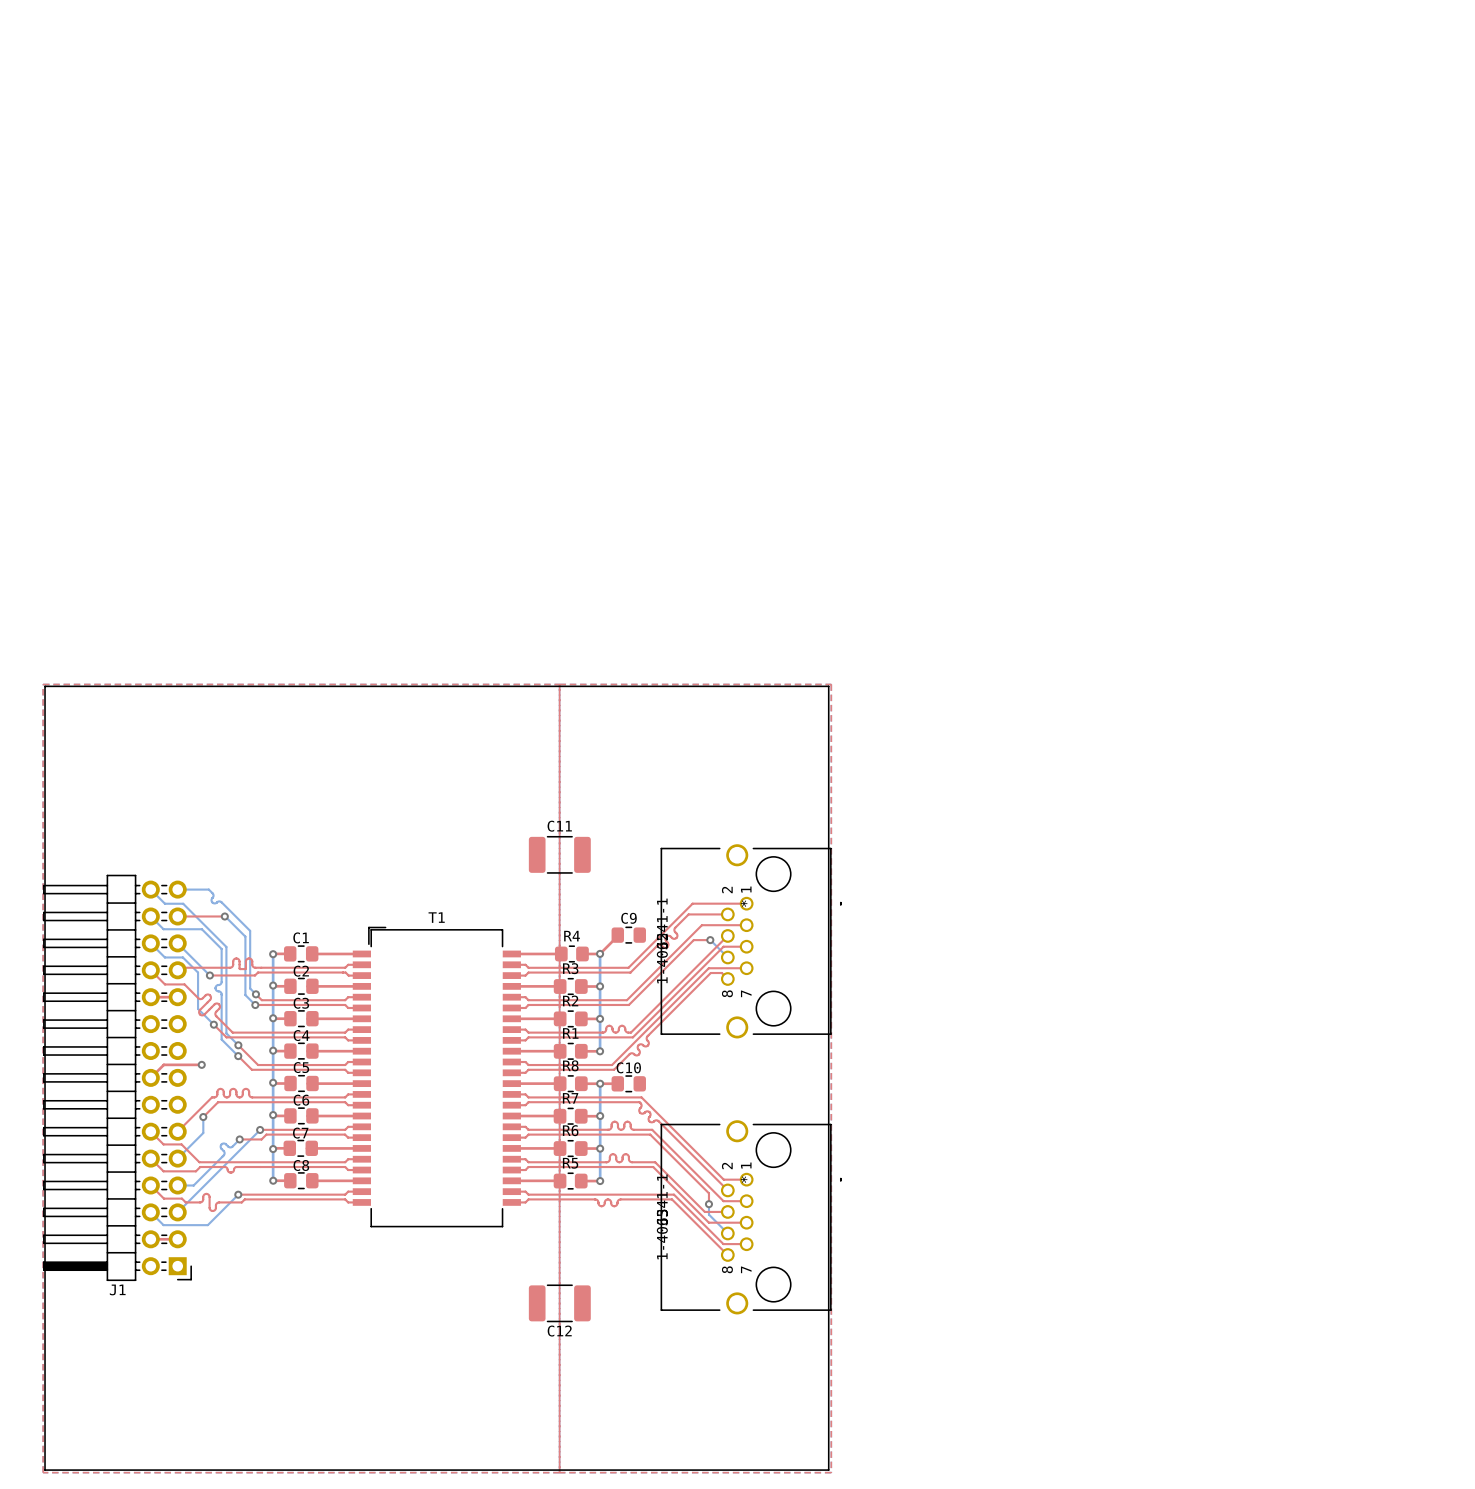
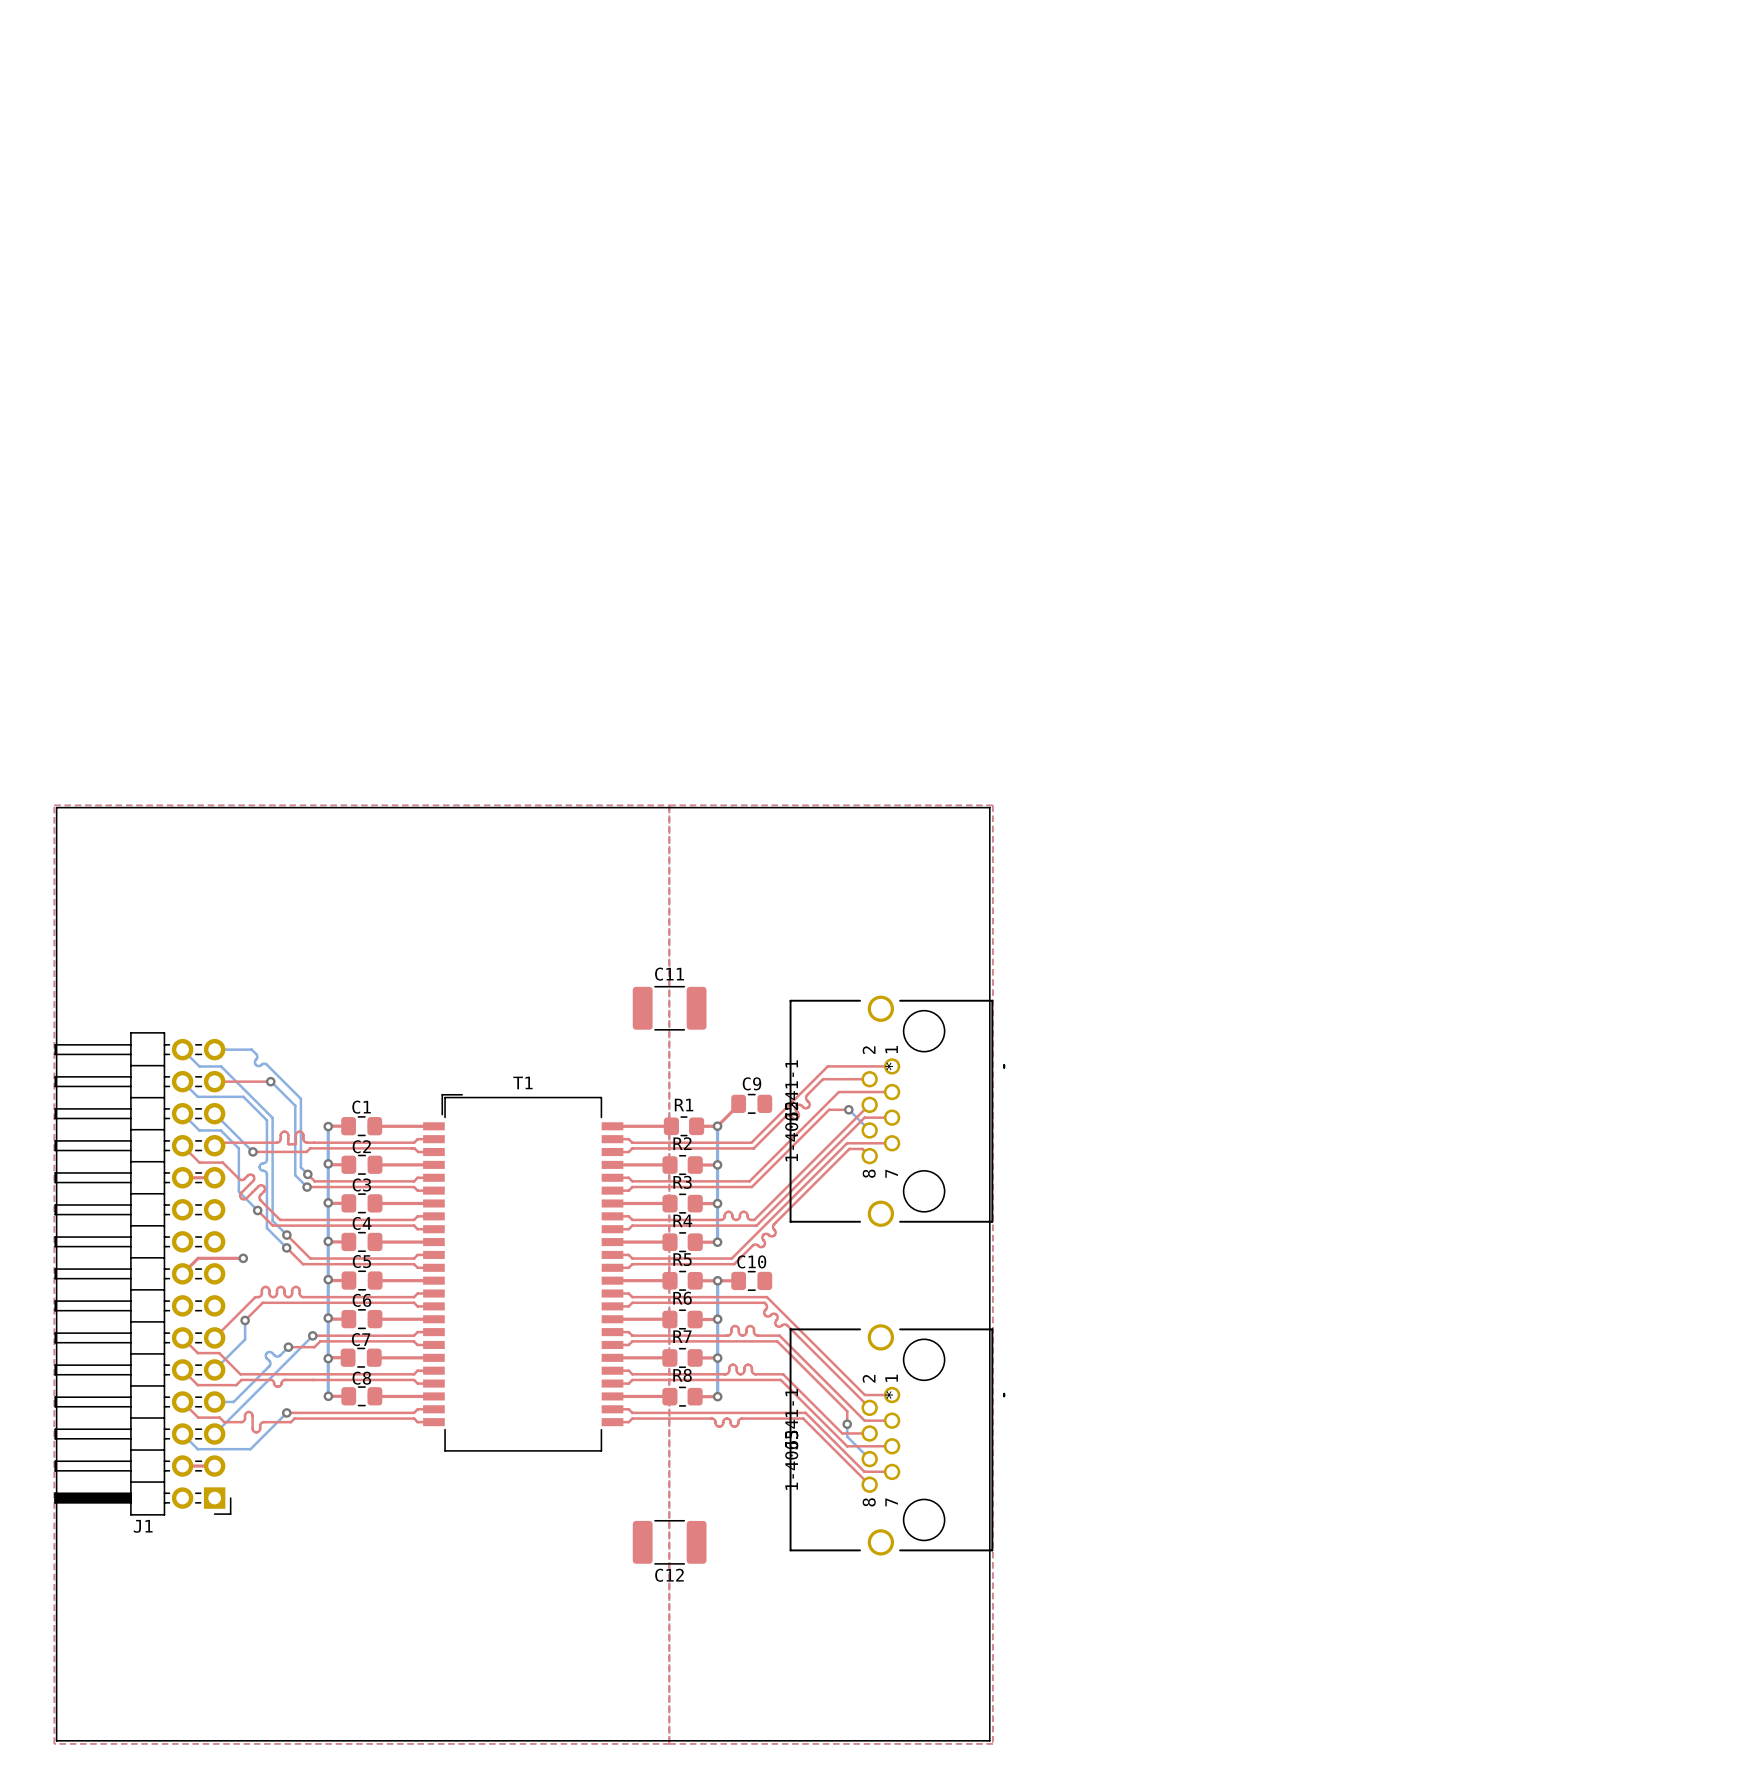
R4 name: R4 (572, 936) -> R1 (684, 1105)
R3 name: R3 (570, 968) -> R2 (682, 1143)
R2 name: R2 (570, 1000) -> R3 (682, 1182)
R1 name: R1 (570, 1033) -> R4 (682, 1220)
R8 name: R8 (570, 1065) -> R5 (682, 1259)
R7 name: R7 (570, 1098) -> R6 (682, 1298)
R6 name: R6 (570, 1130) -> R7 (682, 1336)
R5 name: R5 (570, 1163) -> R8 (682, 1375)

